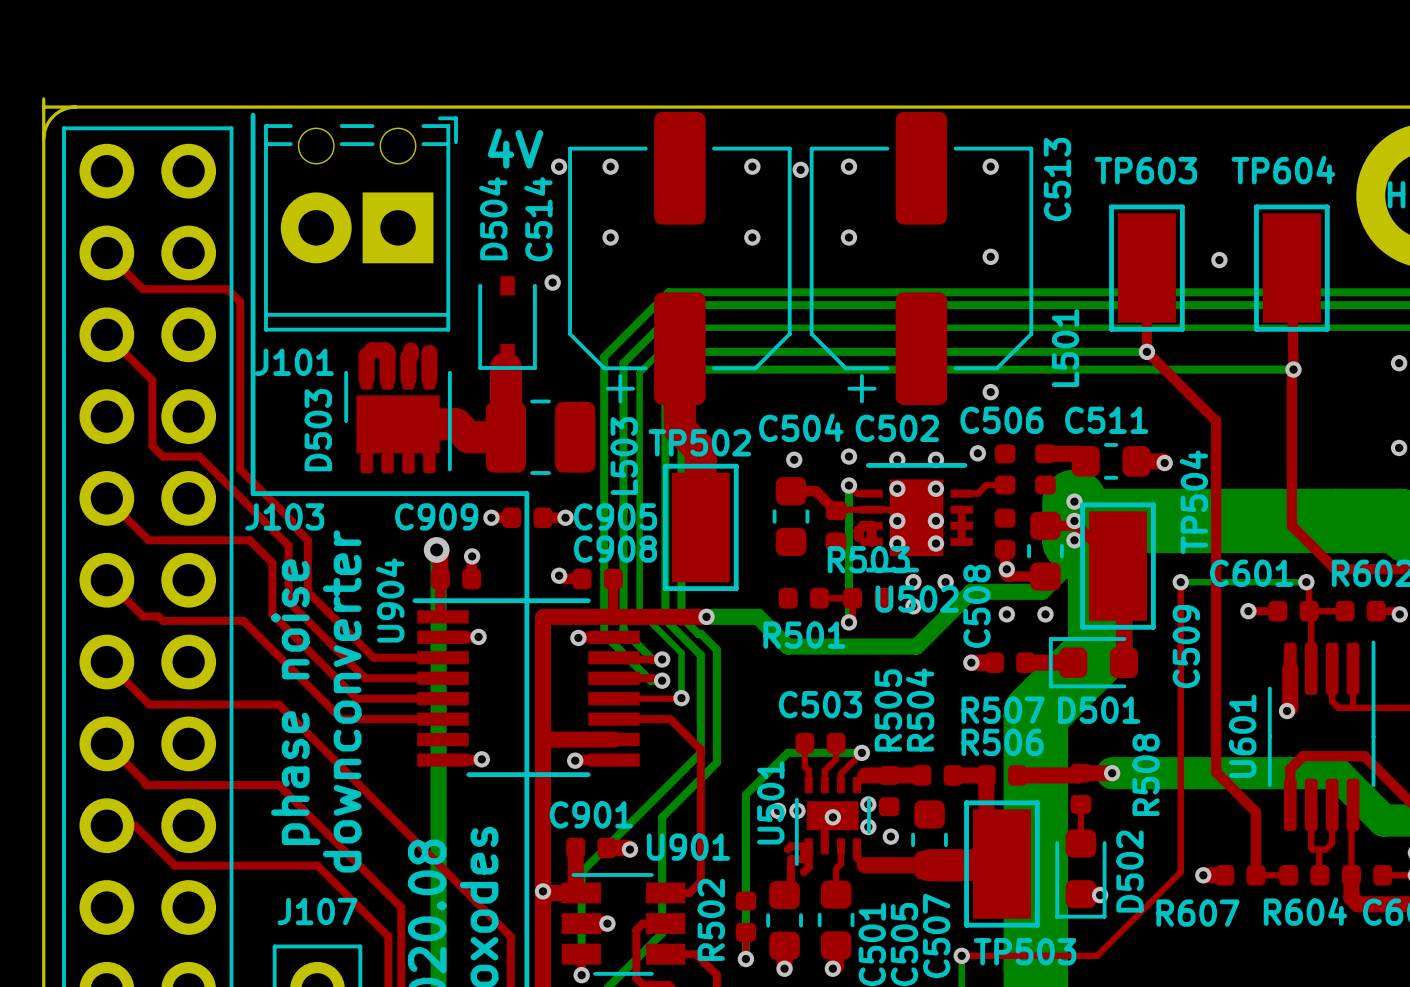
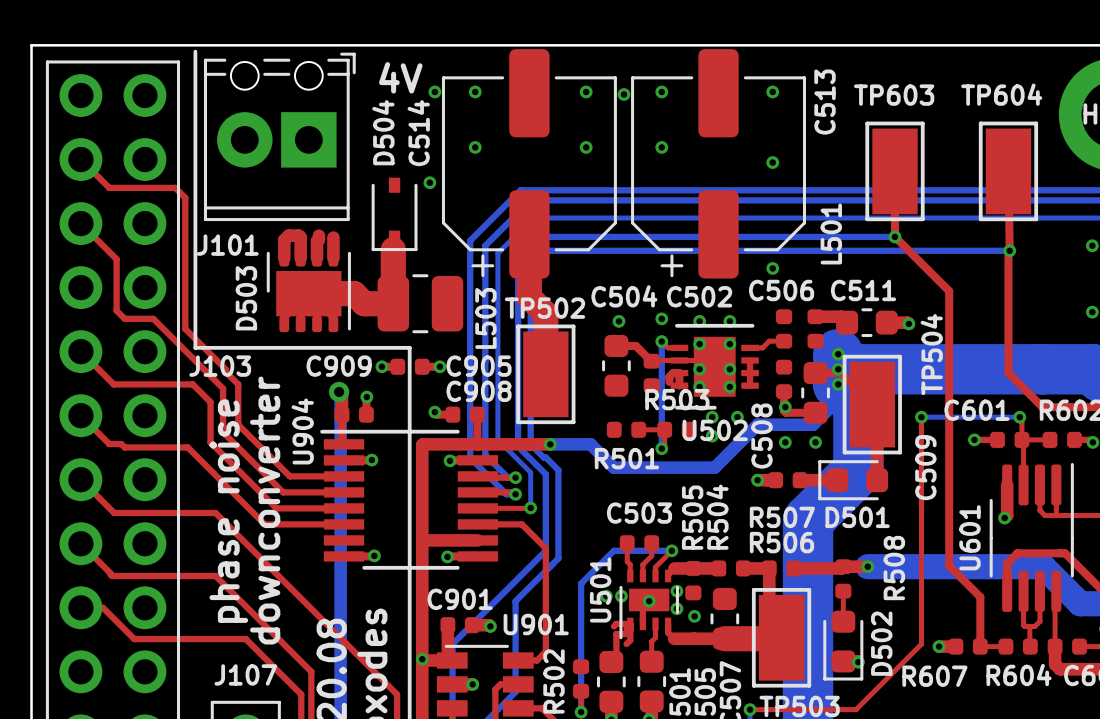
board edge: (43, 99) (43, 107) -> none
board edge: (75, 107) (63, 109) (53, 116) (46, 126) (43, 139) -> none
via: (1219, 260) -> none
via: (977, 453) -> none

